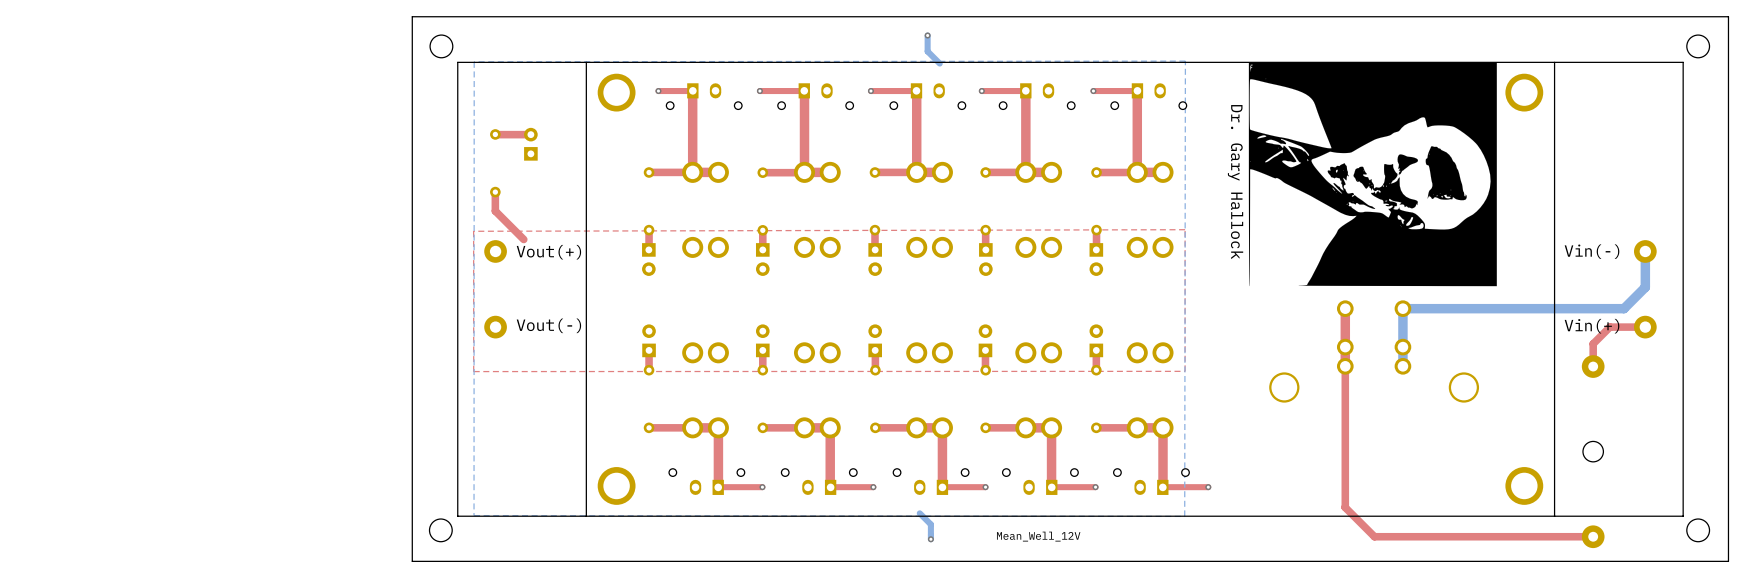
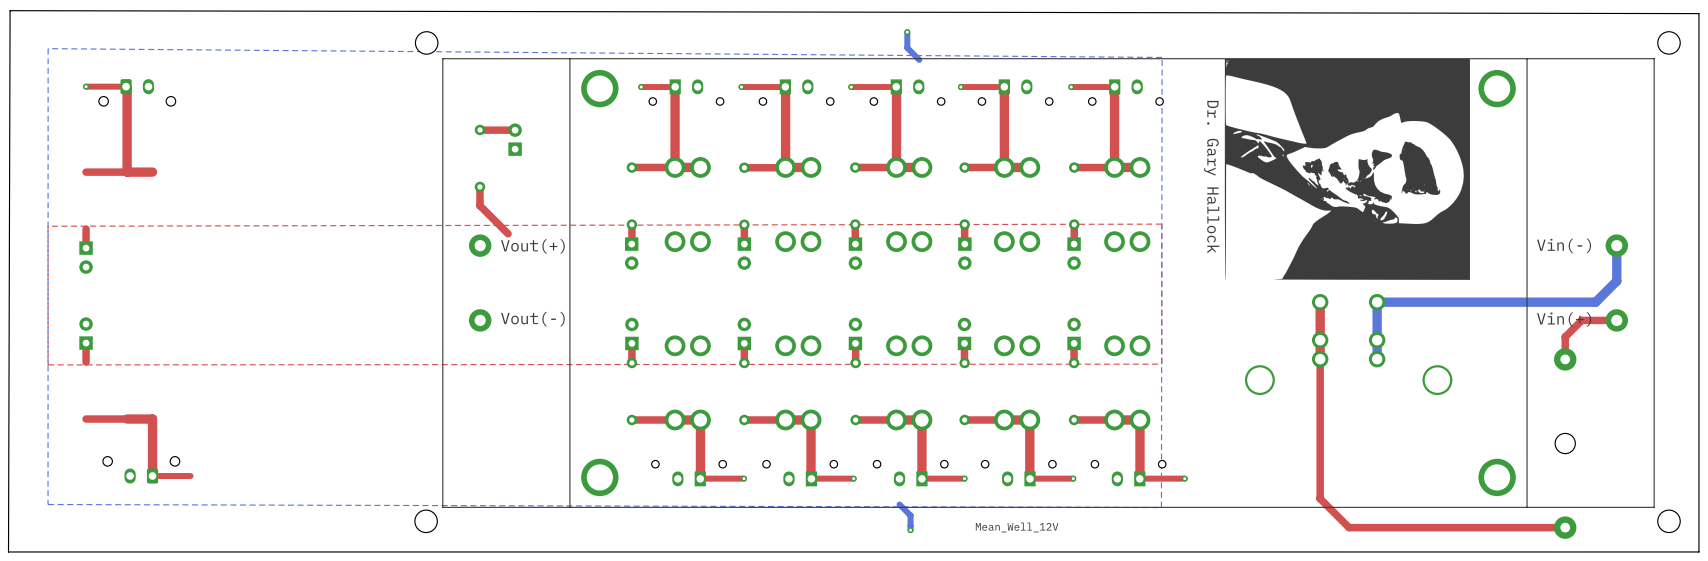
board edge: (1728, 16) (412, 16) (412, 561) -> (1698, 13) (10, 10) (8, 551) (397, 551)
bottom zone outline: (1185, 61) (474, 61) (474, 515) (1184, 516) -> (1162, 57) (48, 48) (48, 504) (1161, 507)
top track: none -> (86, 86) (127, 87) (127, 172)
via: none -> (86, 86)
part: none -> (137, 92)
top track: none -> (127, 172) (86, 172)
top track: none -> (152, 172) (127, 172)
top zone outline: (1185, 229) (473, 231) (473, 371) (1185, 371) -> (1161, 224) (48, 226) (48, 364) (1161, 364)
top track: none -> (86, 229) (86, 248)
part: none -> (86, 257)
part: none -> (86, 333)
top track: none -> (86, 343) (86, 362)
top track: none -> (86, 419) (152, 419) (152, 476) (190, 476)
part: none -> (141, 470)

